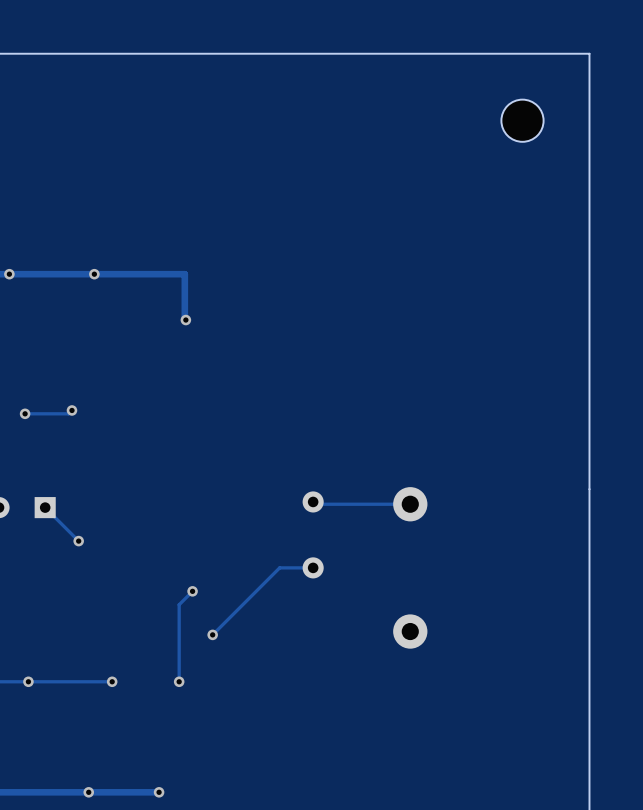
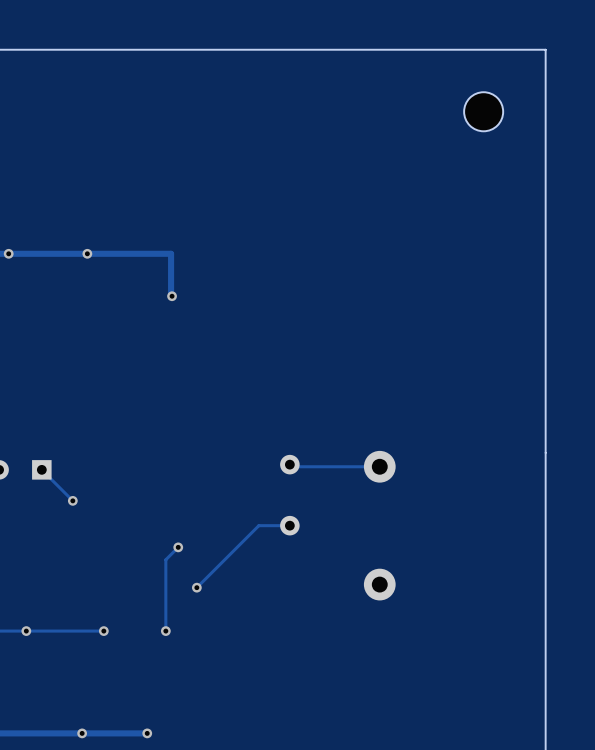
track: (71, 410) (68, 413) (25, 413) -> none
via: (71, 410) -> none
via: (25, 413) -> none

